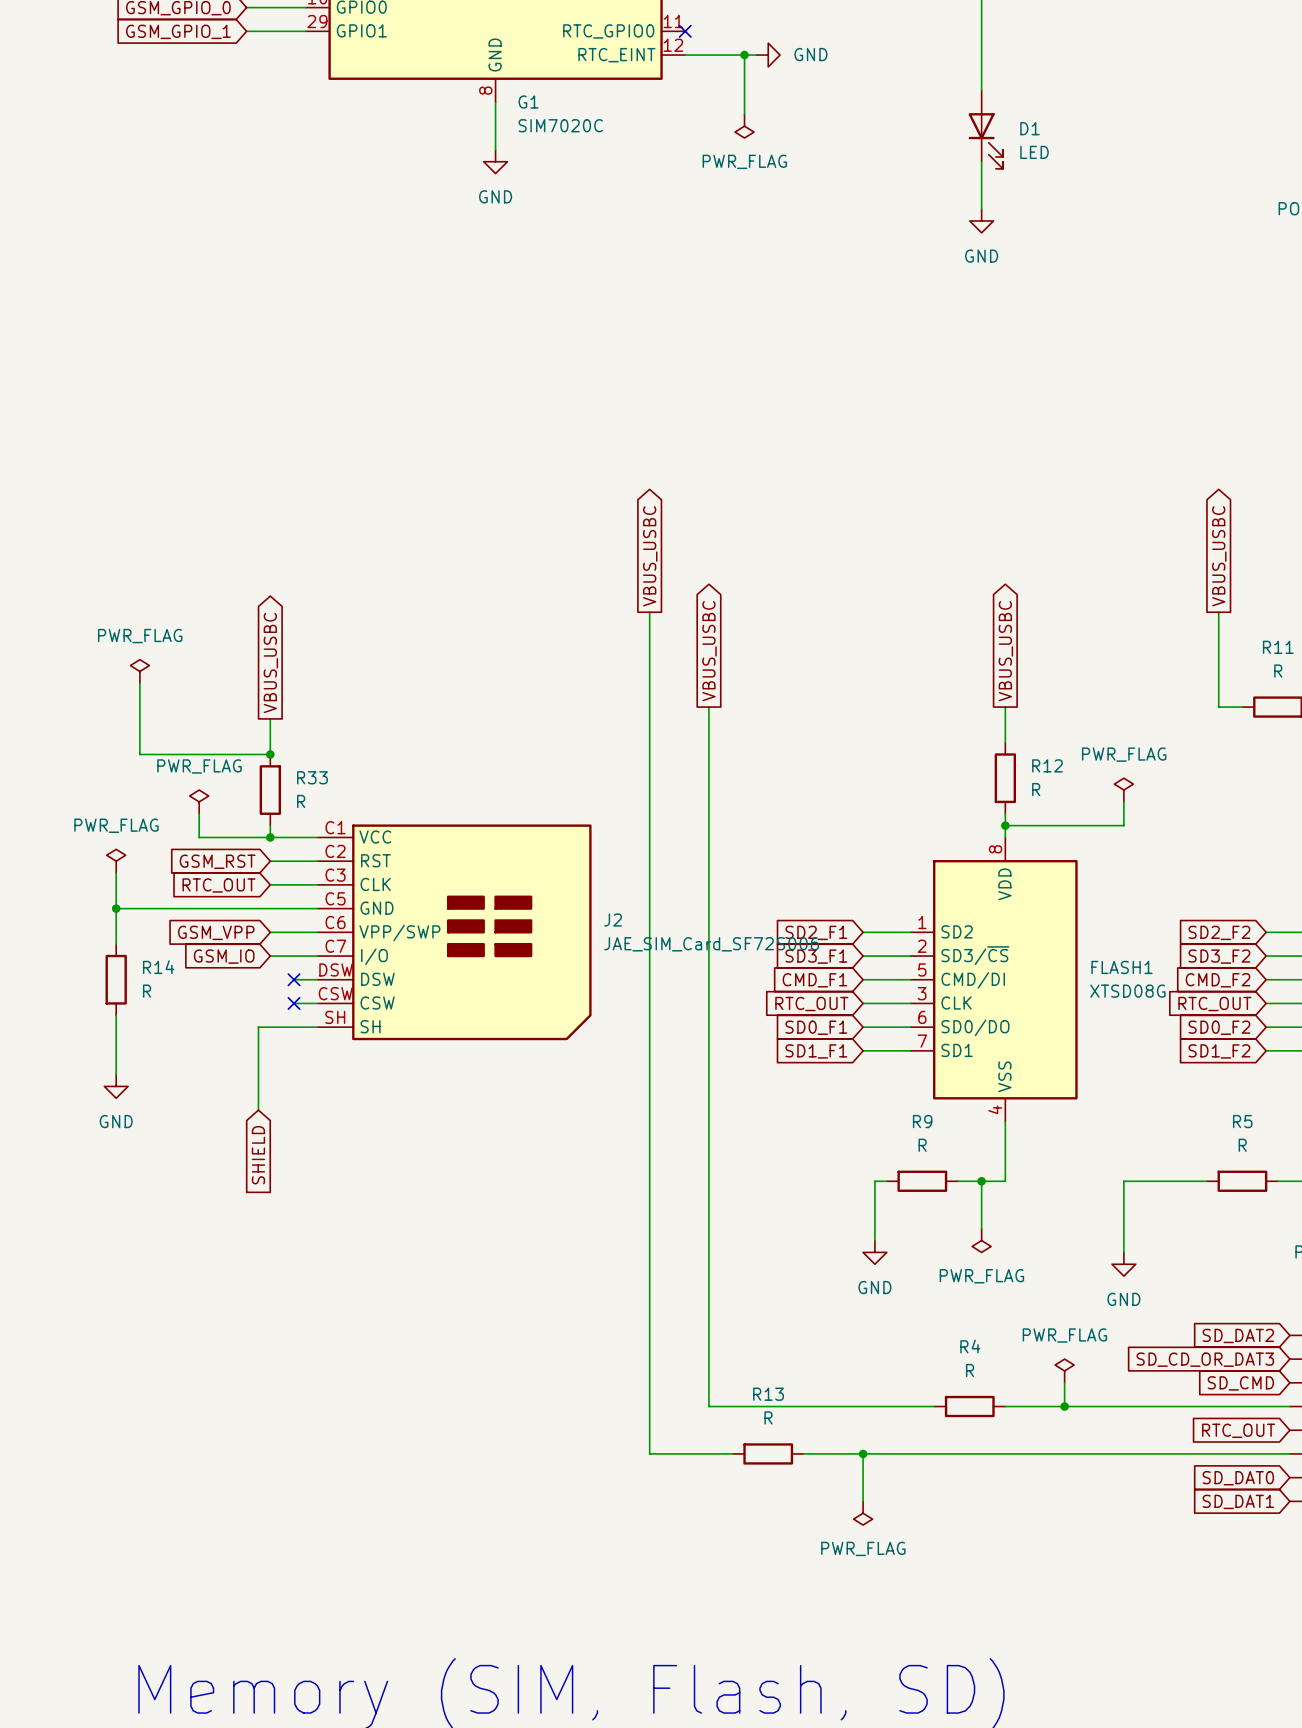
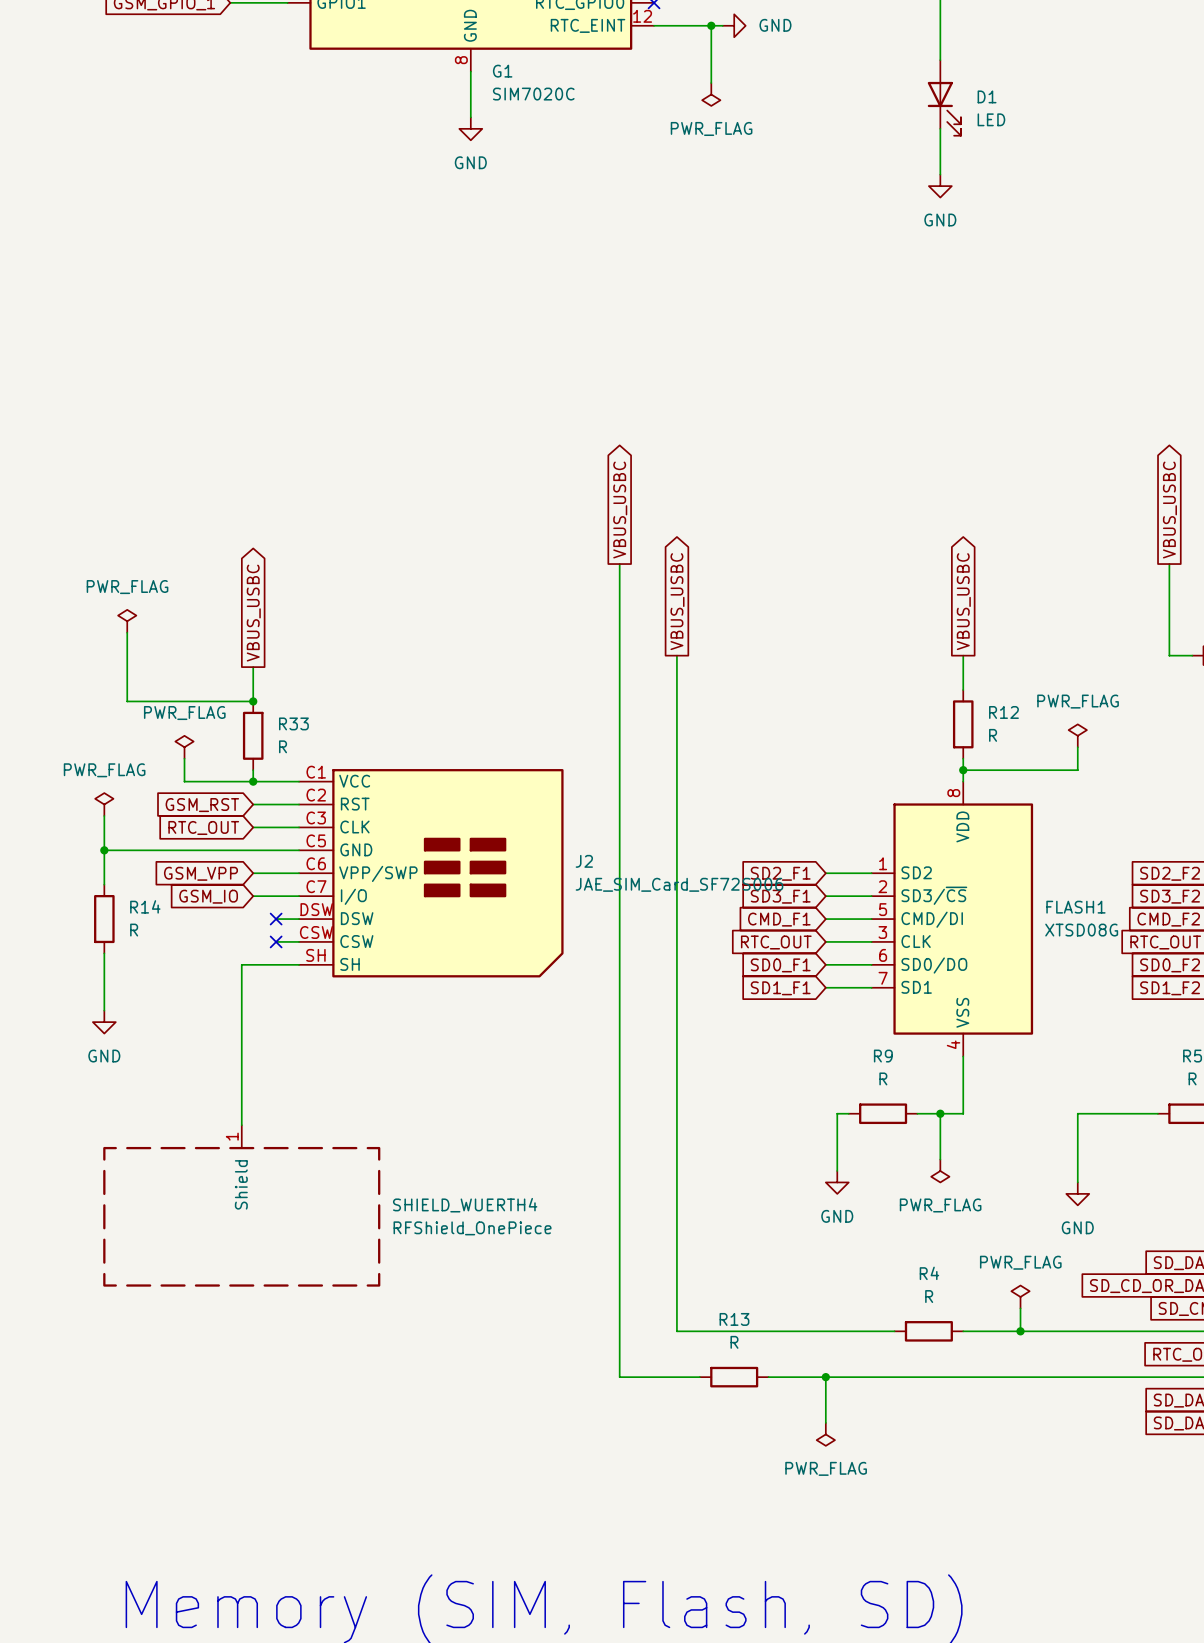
wire: none -> (241, 1045) (241, 1125)
global label: SHIELD (258, 1155) -> none
SHIELD_WUERTH4: none -> RFShield_OnePiece (241, 1205)

